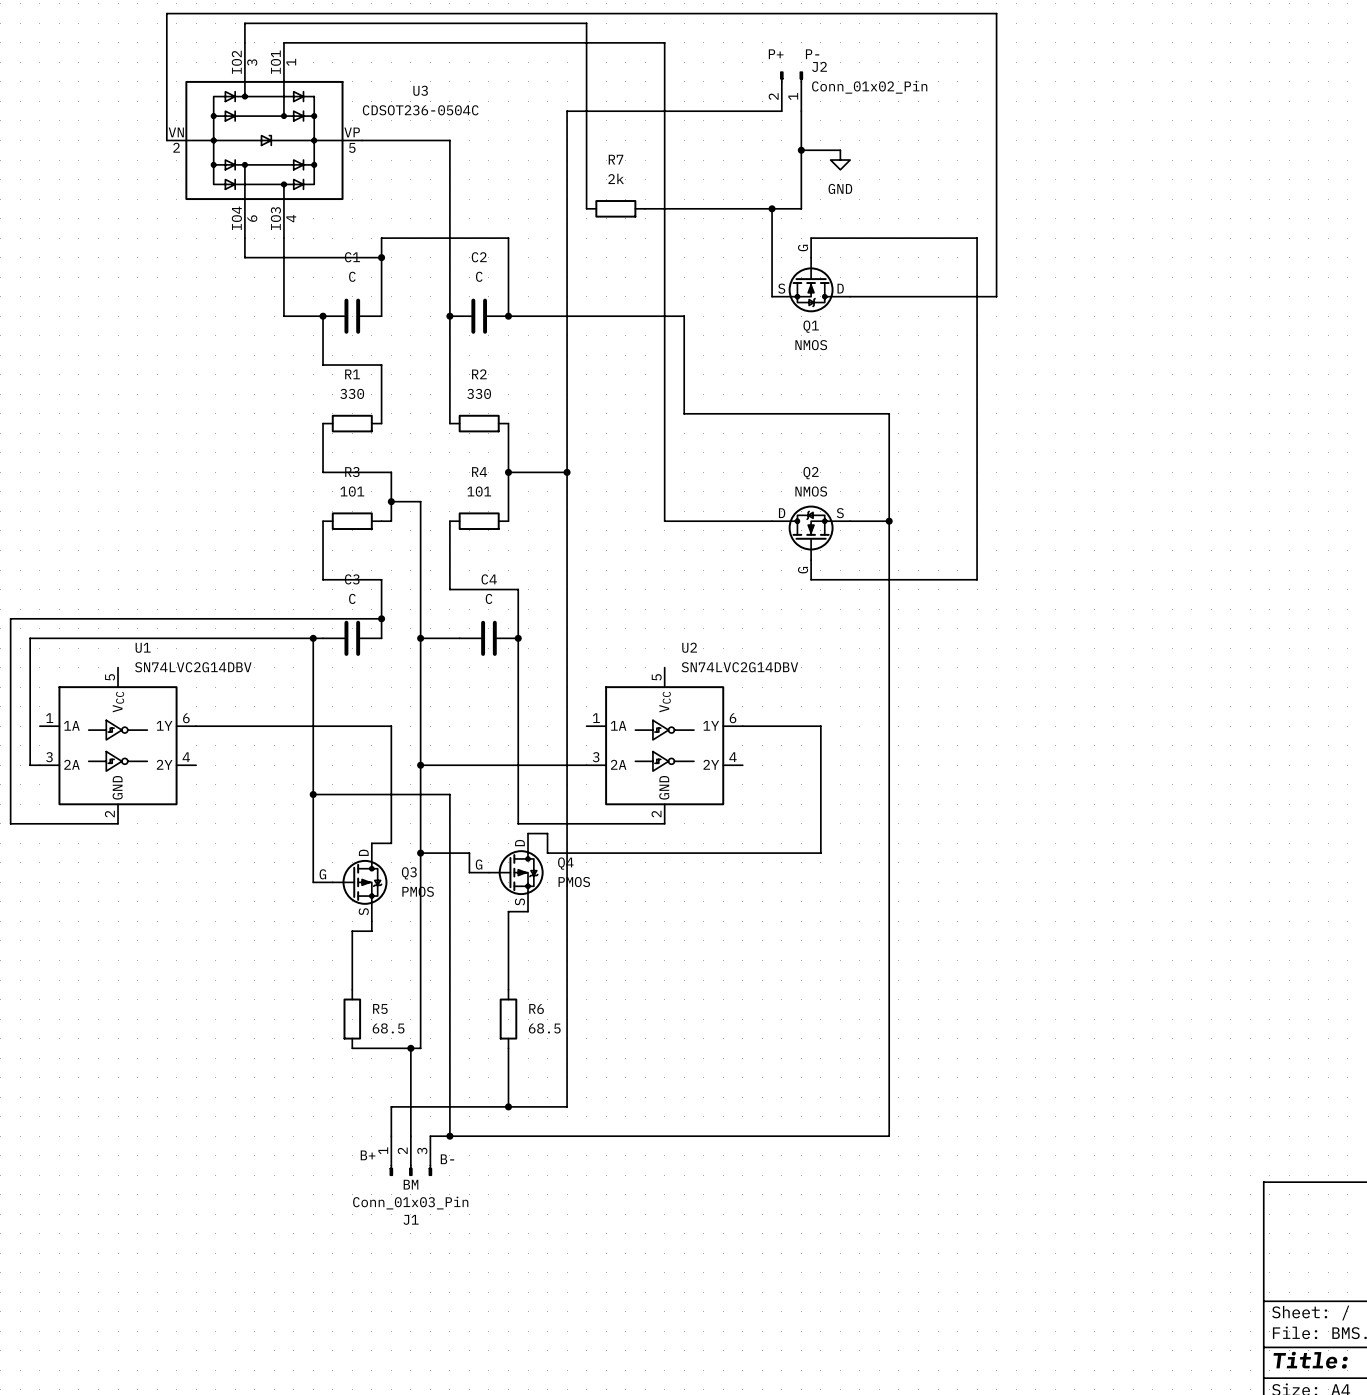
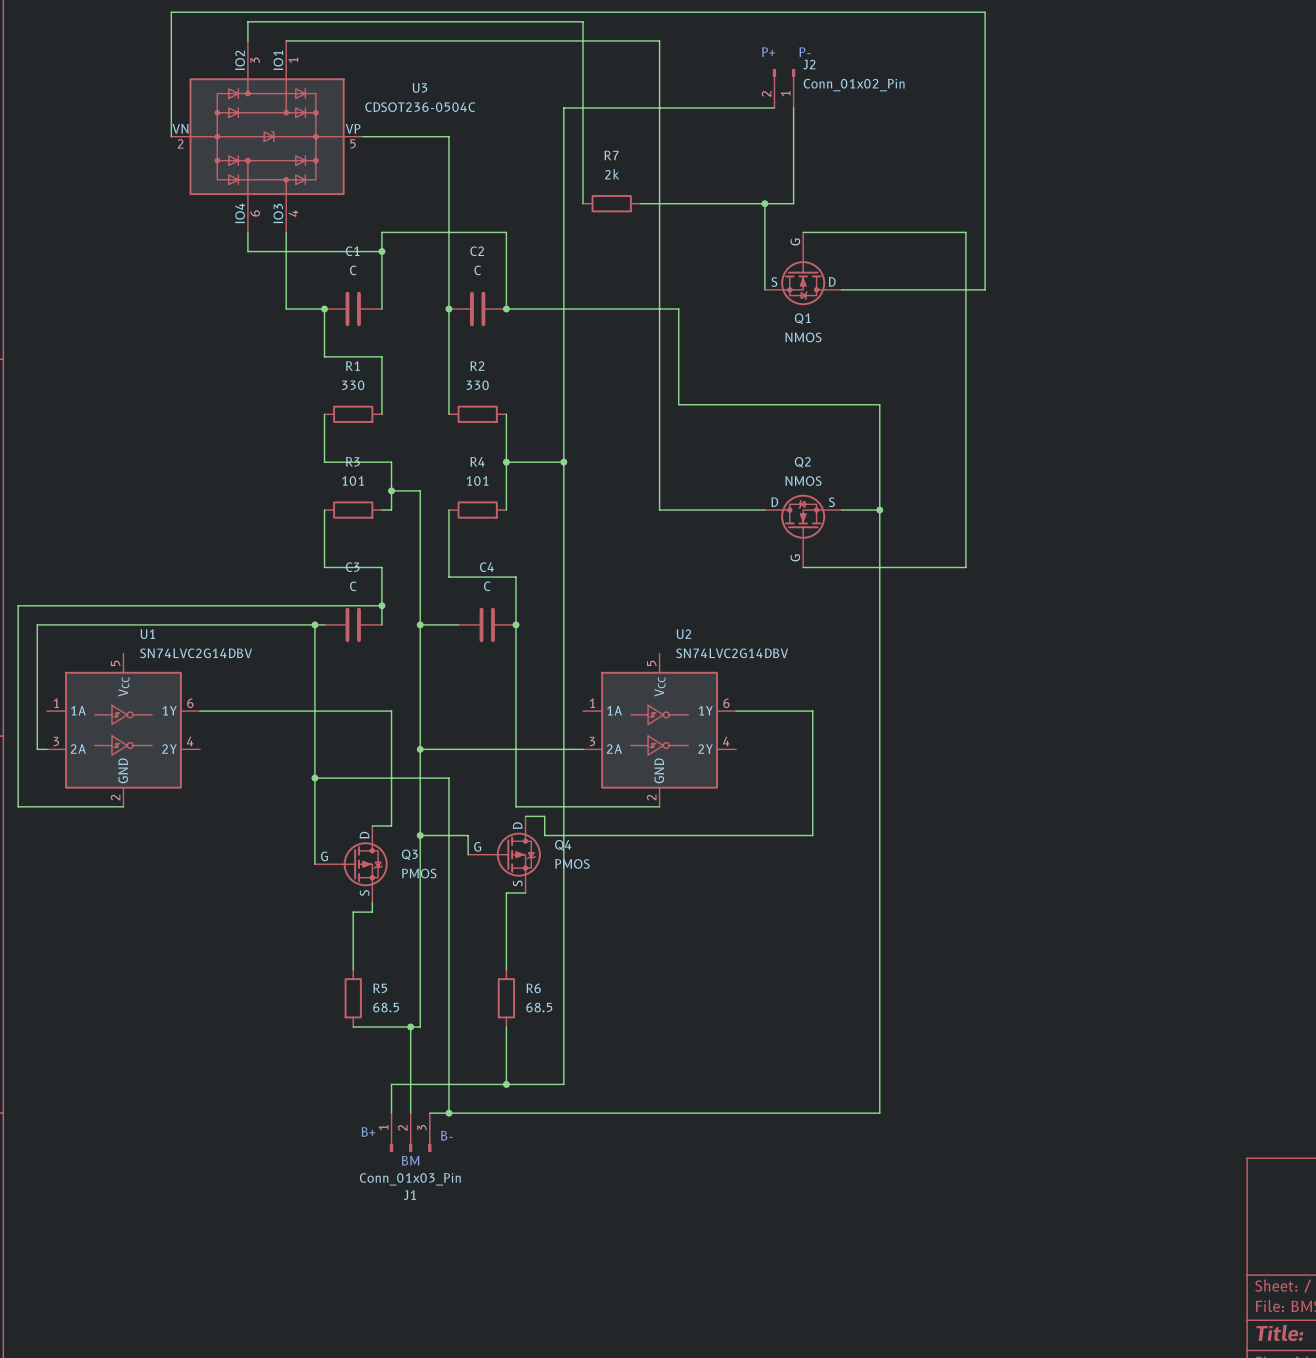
wire: (801, 150) (840, 150) -> none
junction: (801, 150) -> none
power symbol: GND (840, 160) -> none

